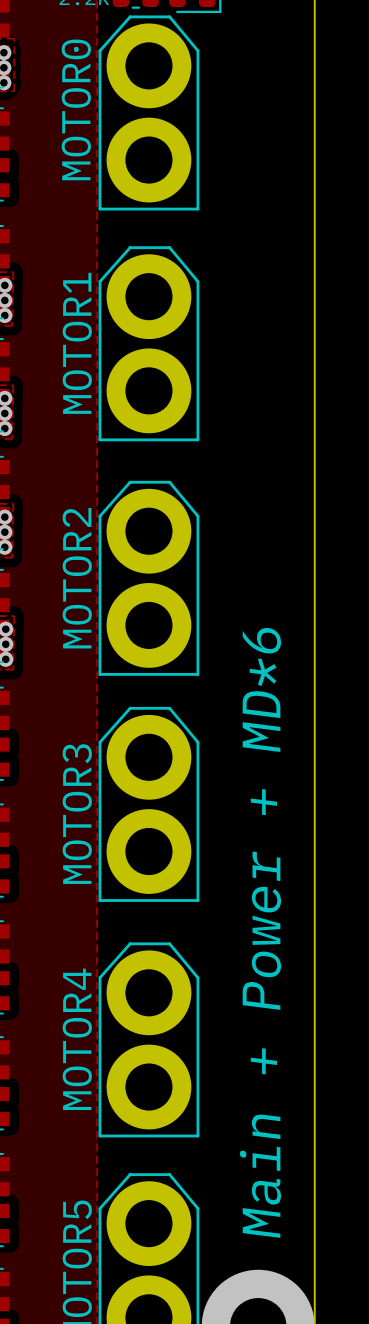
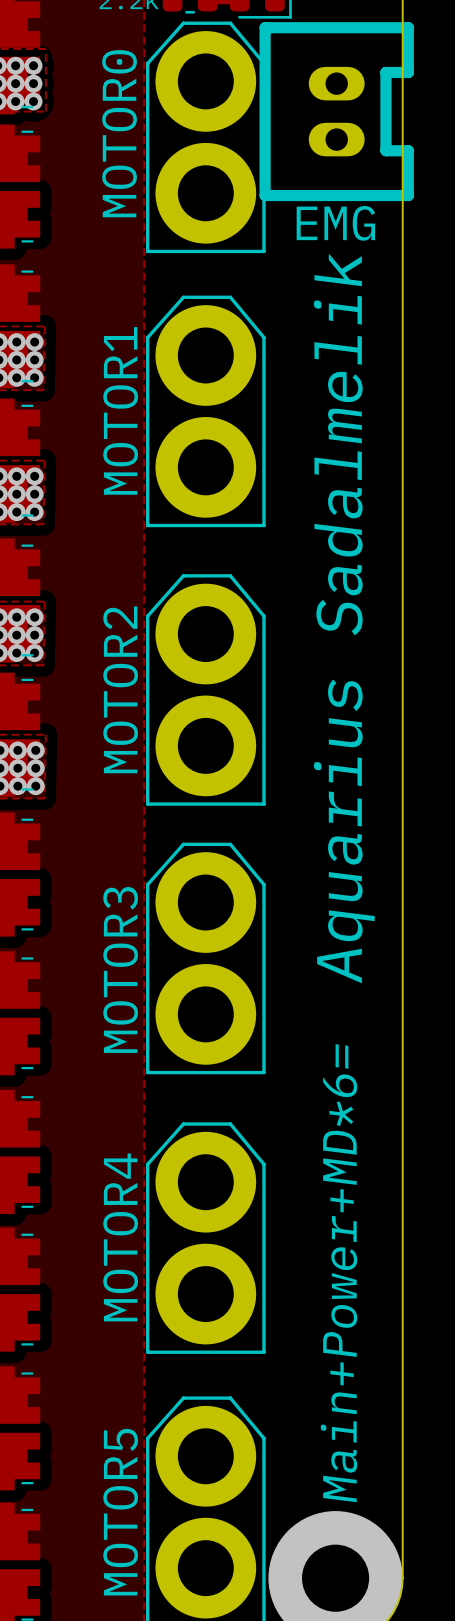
part: none -> (336, 111)
text: none -> EMG (335, 223)
text: none -> Aquarius Sadalmelik (344, 618)
text: Main + Power + MD*6 (260, 932) -> Main+Power+MD*6= (339, 1273)

